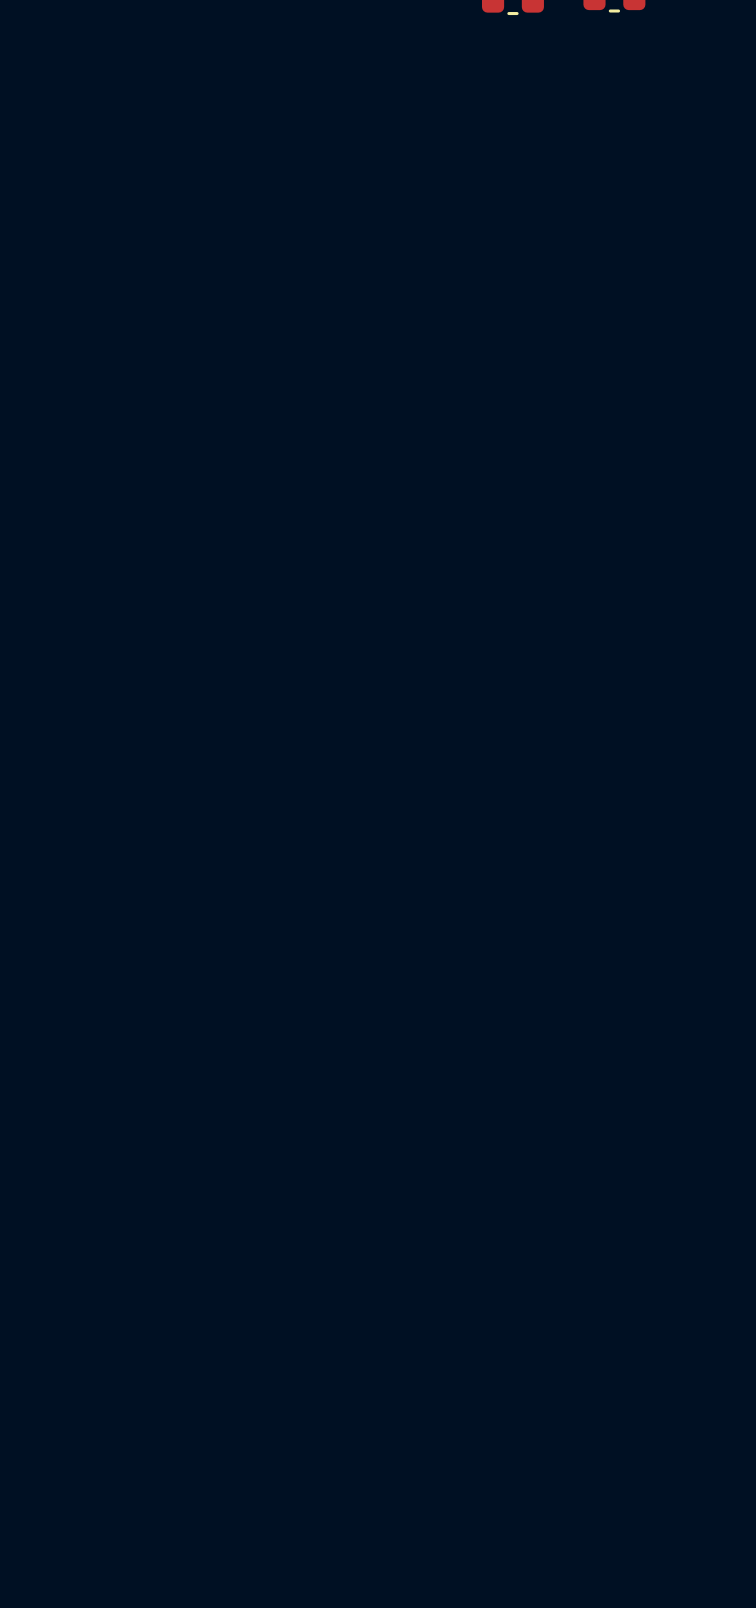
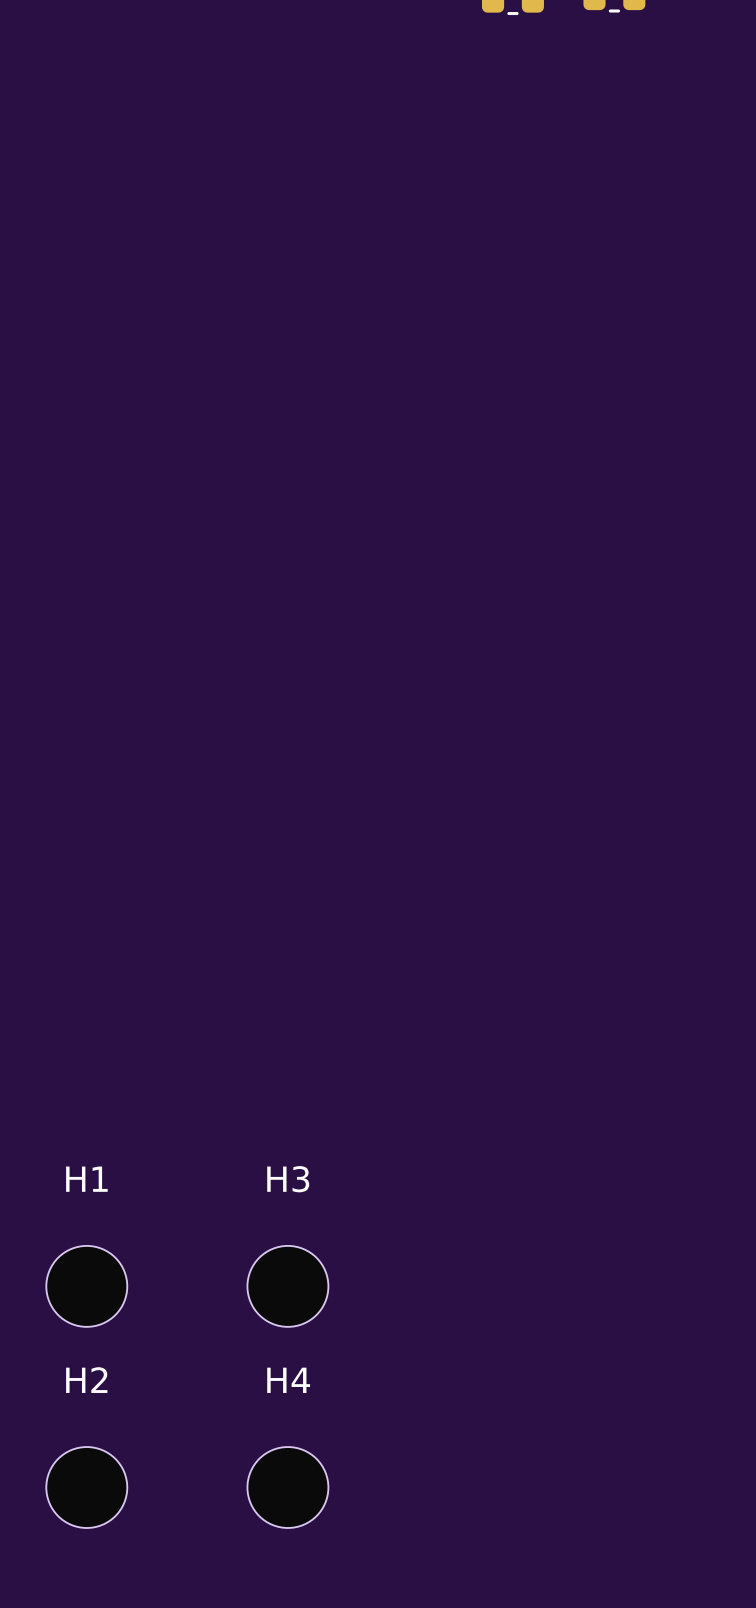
H1: none -> (86, 1286)
H3: none -> (287, 1286)
H2: none -> (86, 1487)
H4: none -> (287, 1487)

